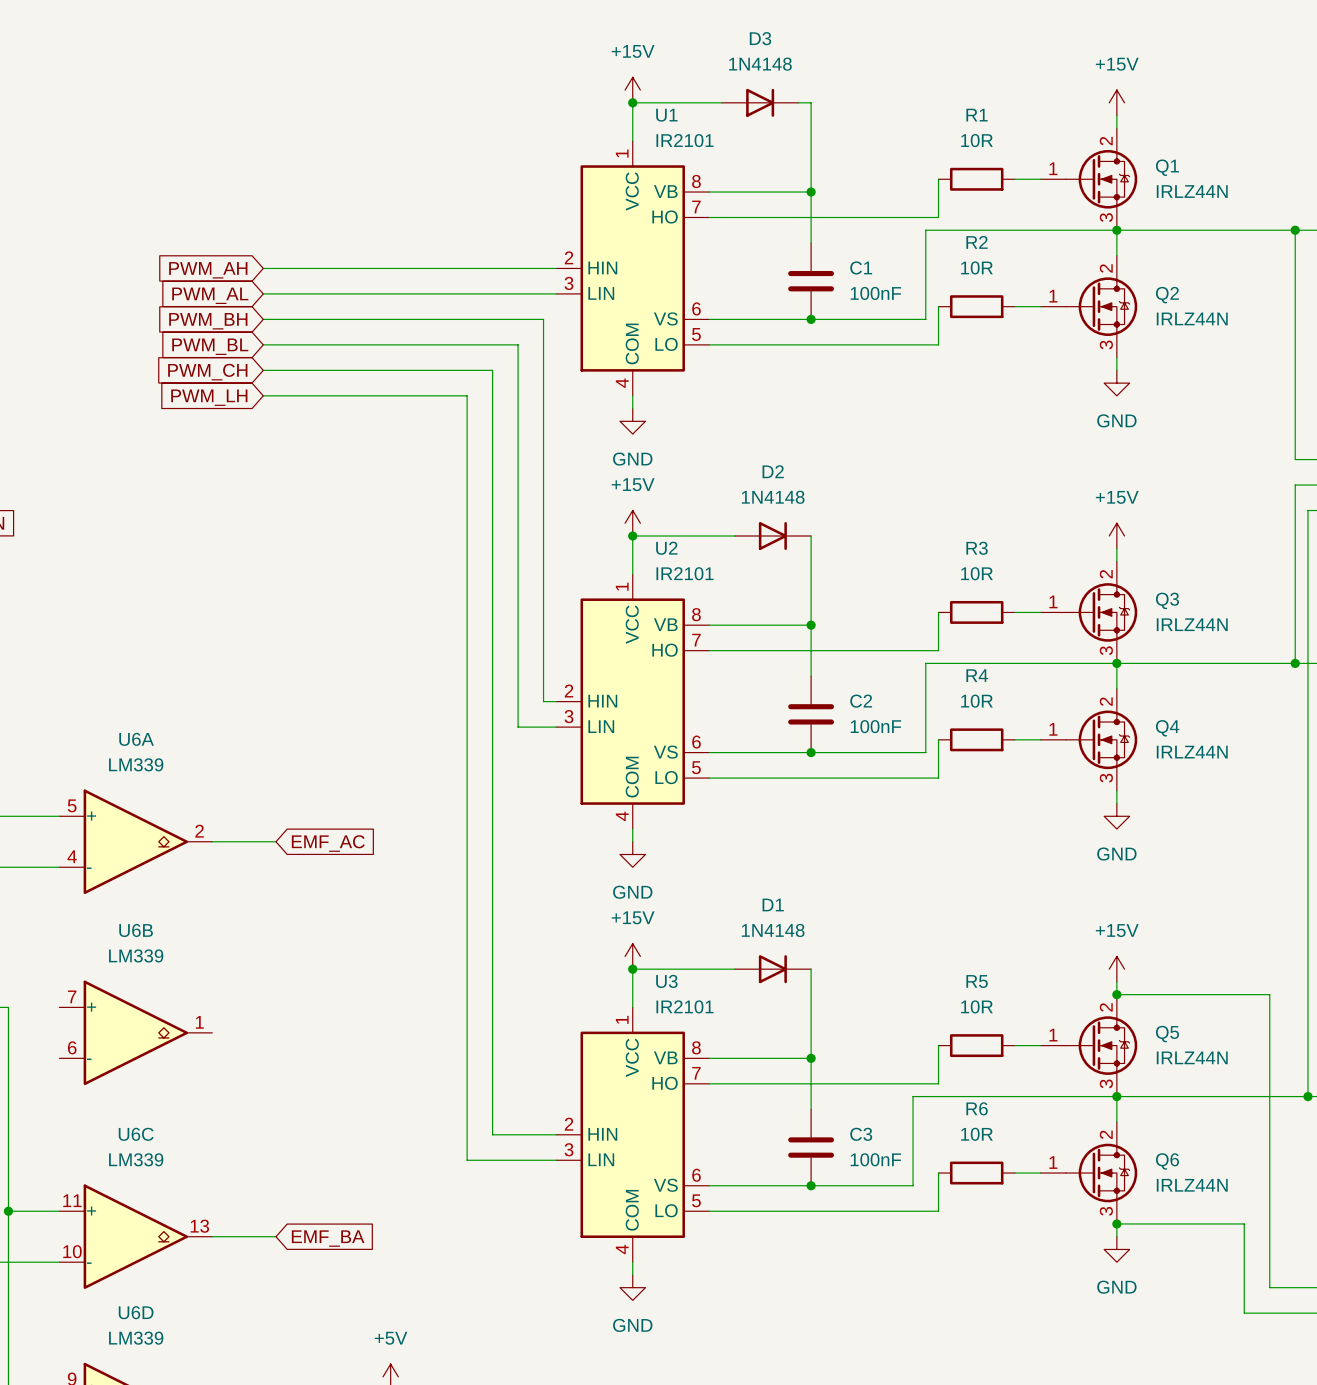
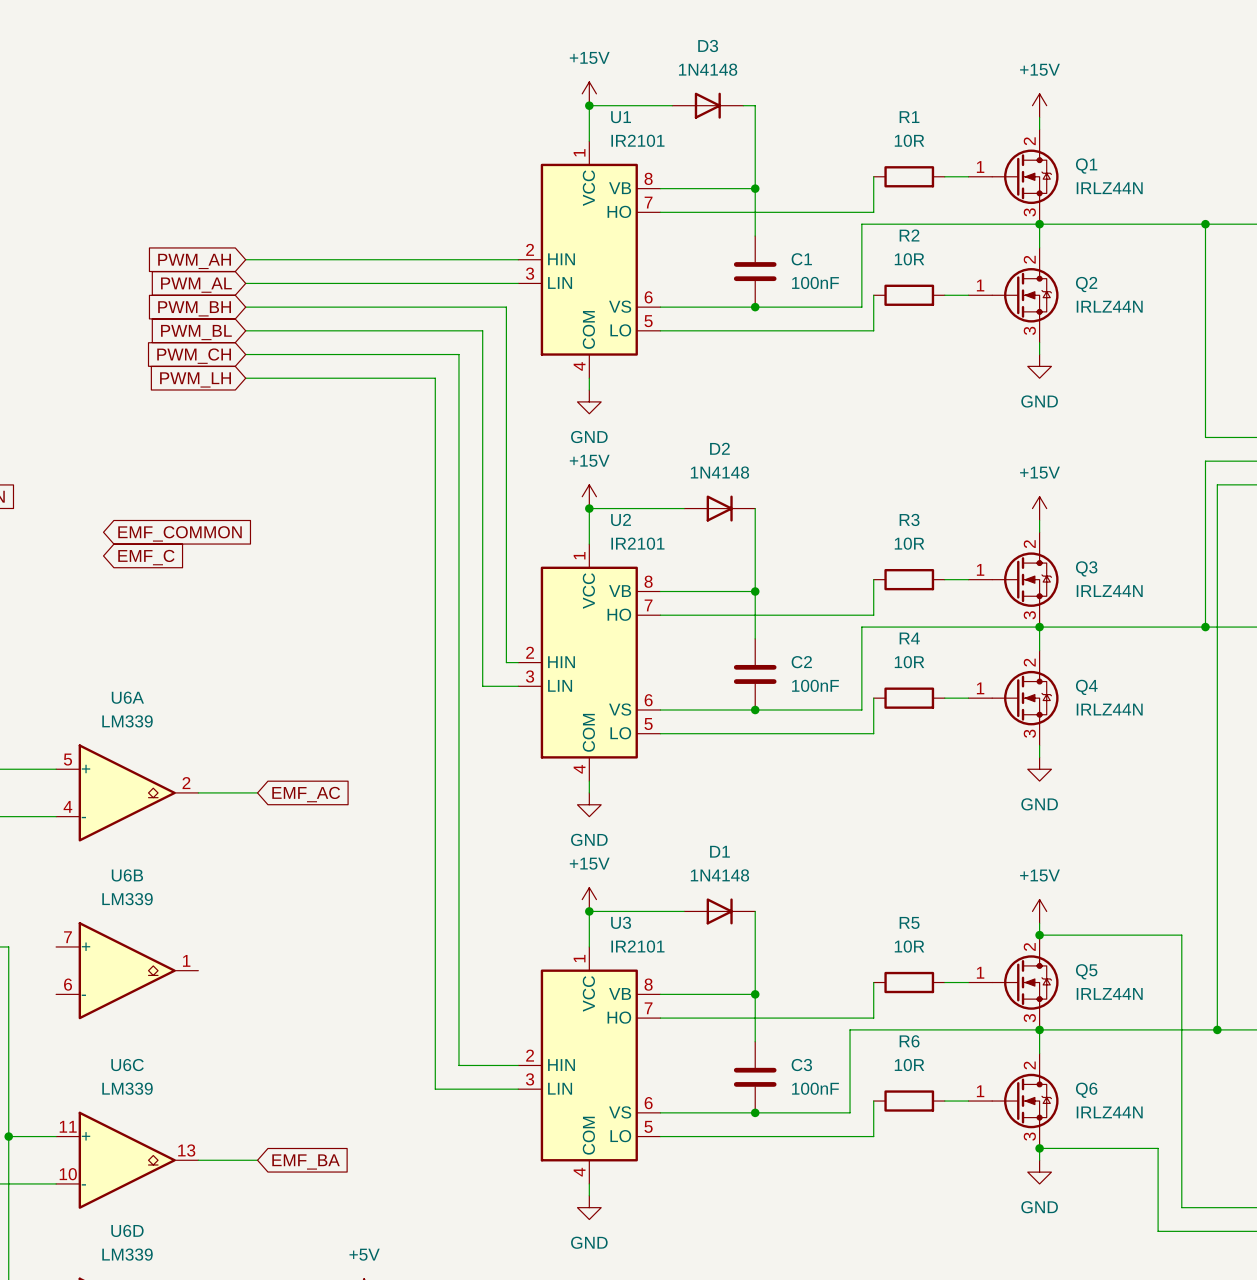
global label: none -> EMF_COMMON (180, 533)
global label: none -> EMF_C (146, 557)

